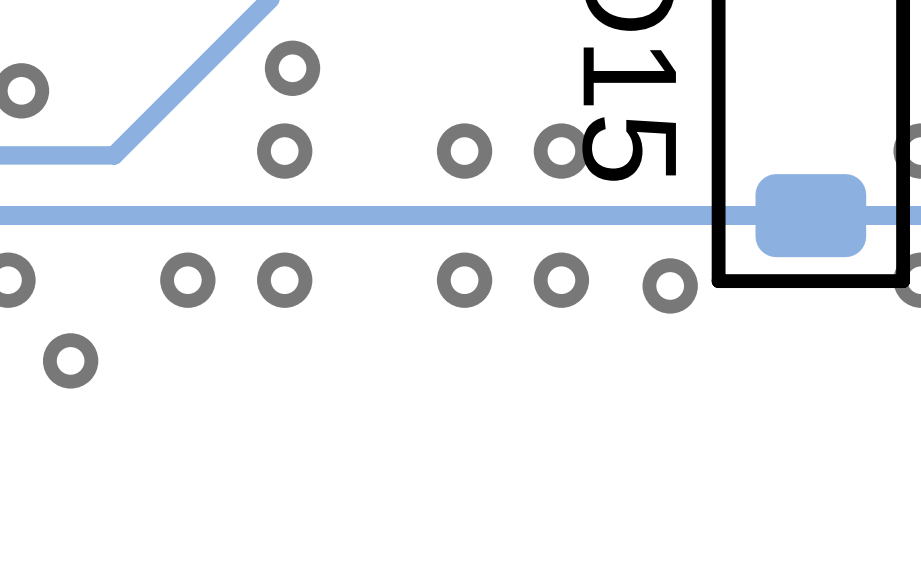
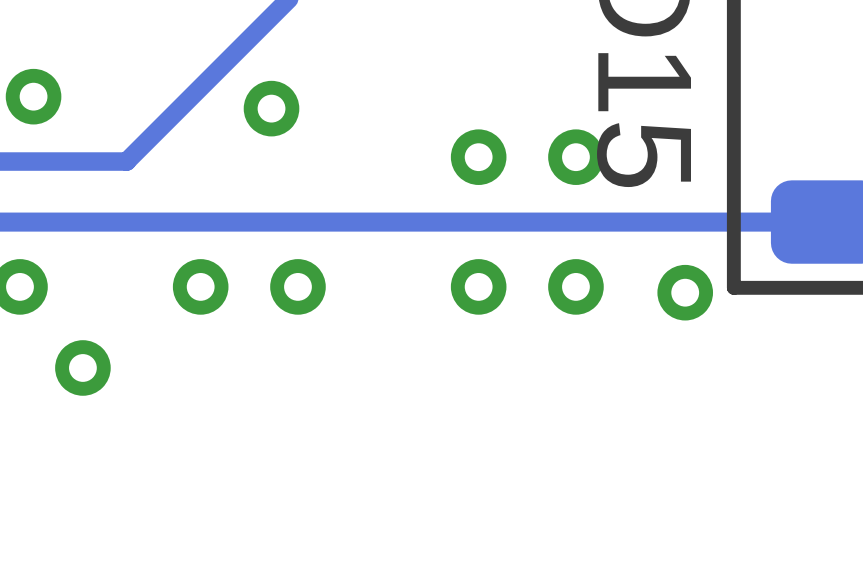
via: (292, 68) -> none
via: none -> (271, 108)
via: (284, 151) -> none

